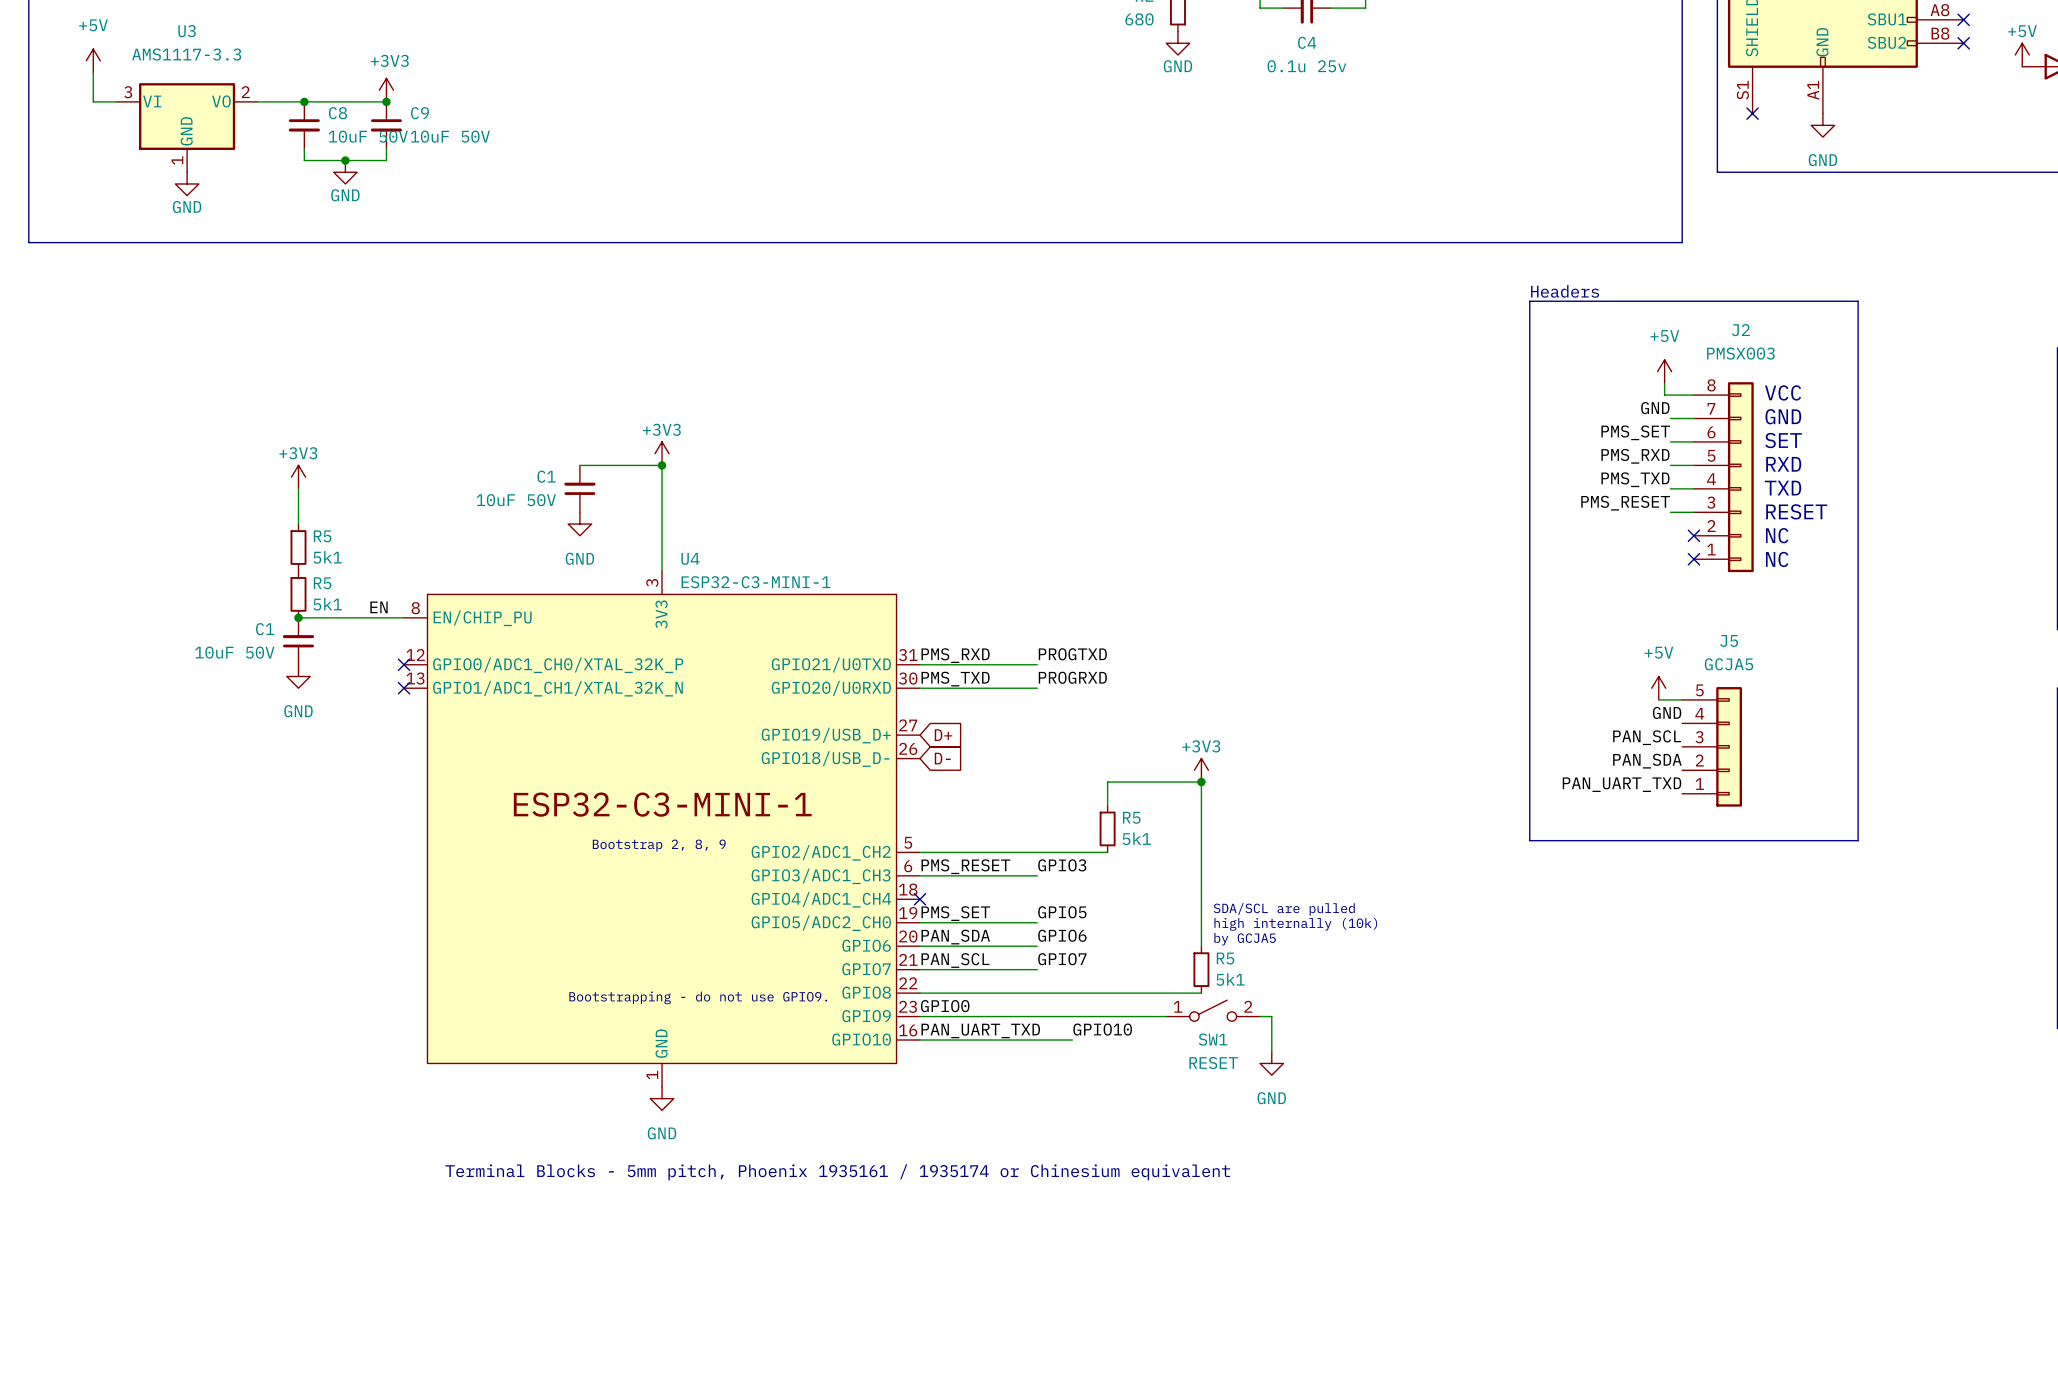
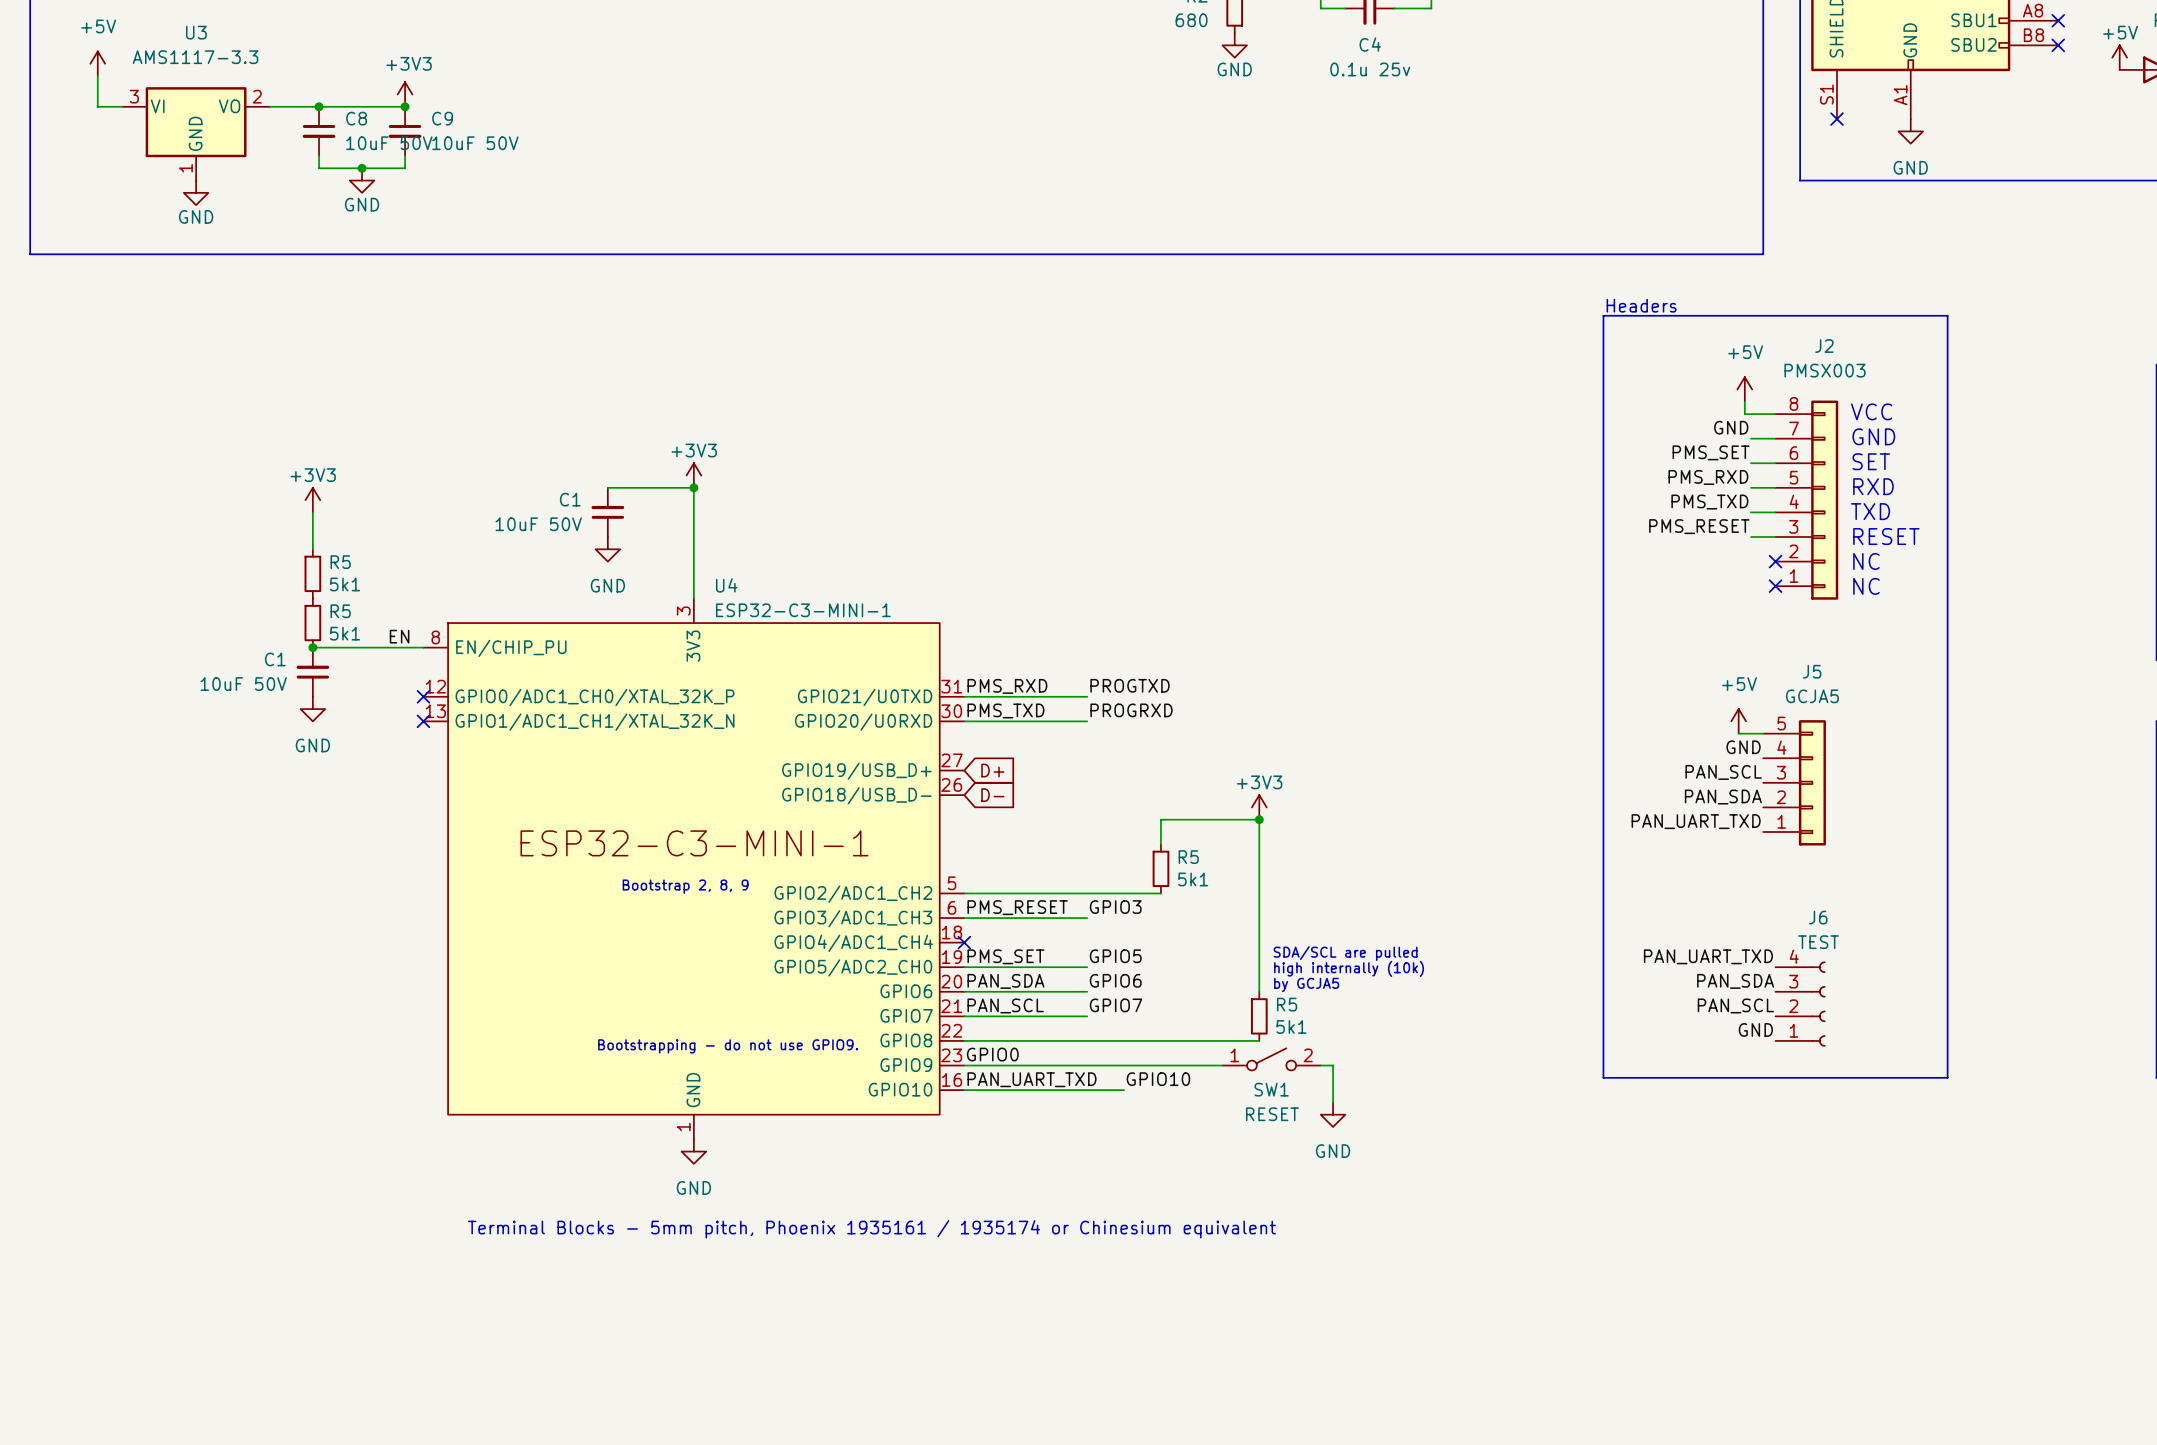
line: (1529, 840) (1858, 840) -> (1603, 881) (1603, 1077) (1947, 1077) (1947, 881)
label: none -> PAN_UART_TXD (1708, 956)
label: none -> PAN_SDA (1735, 981)
J6: none -> TEST (1800, 1004)
label: none -> PAN_SCL (1735, 1005)
label: none -> GND (1755, 1029)

